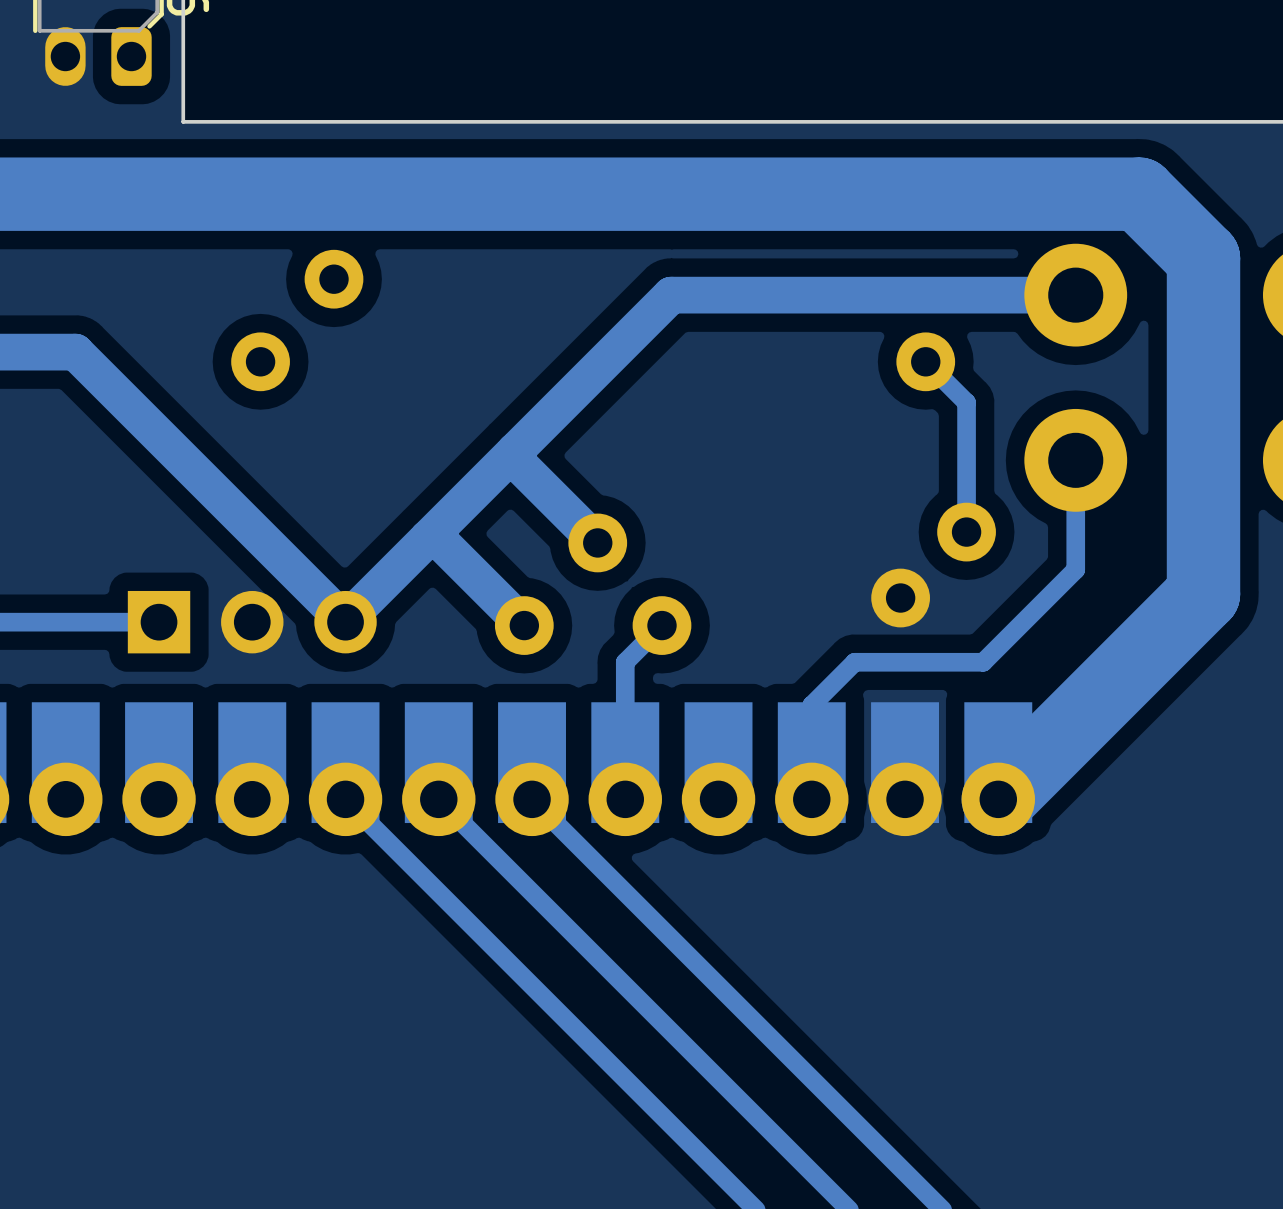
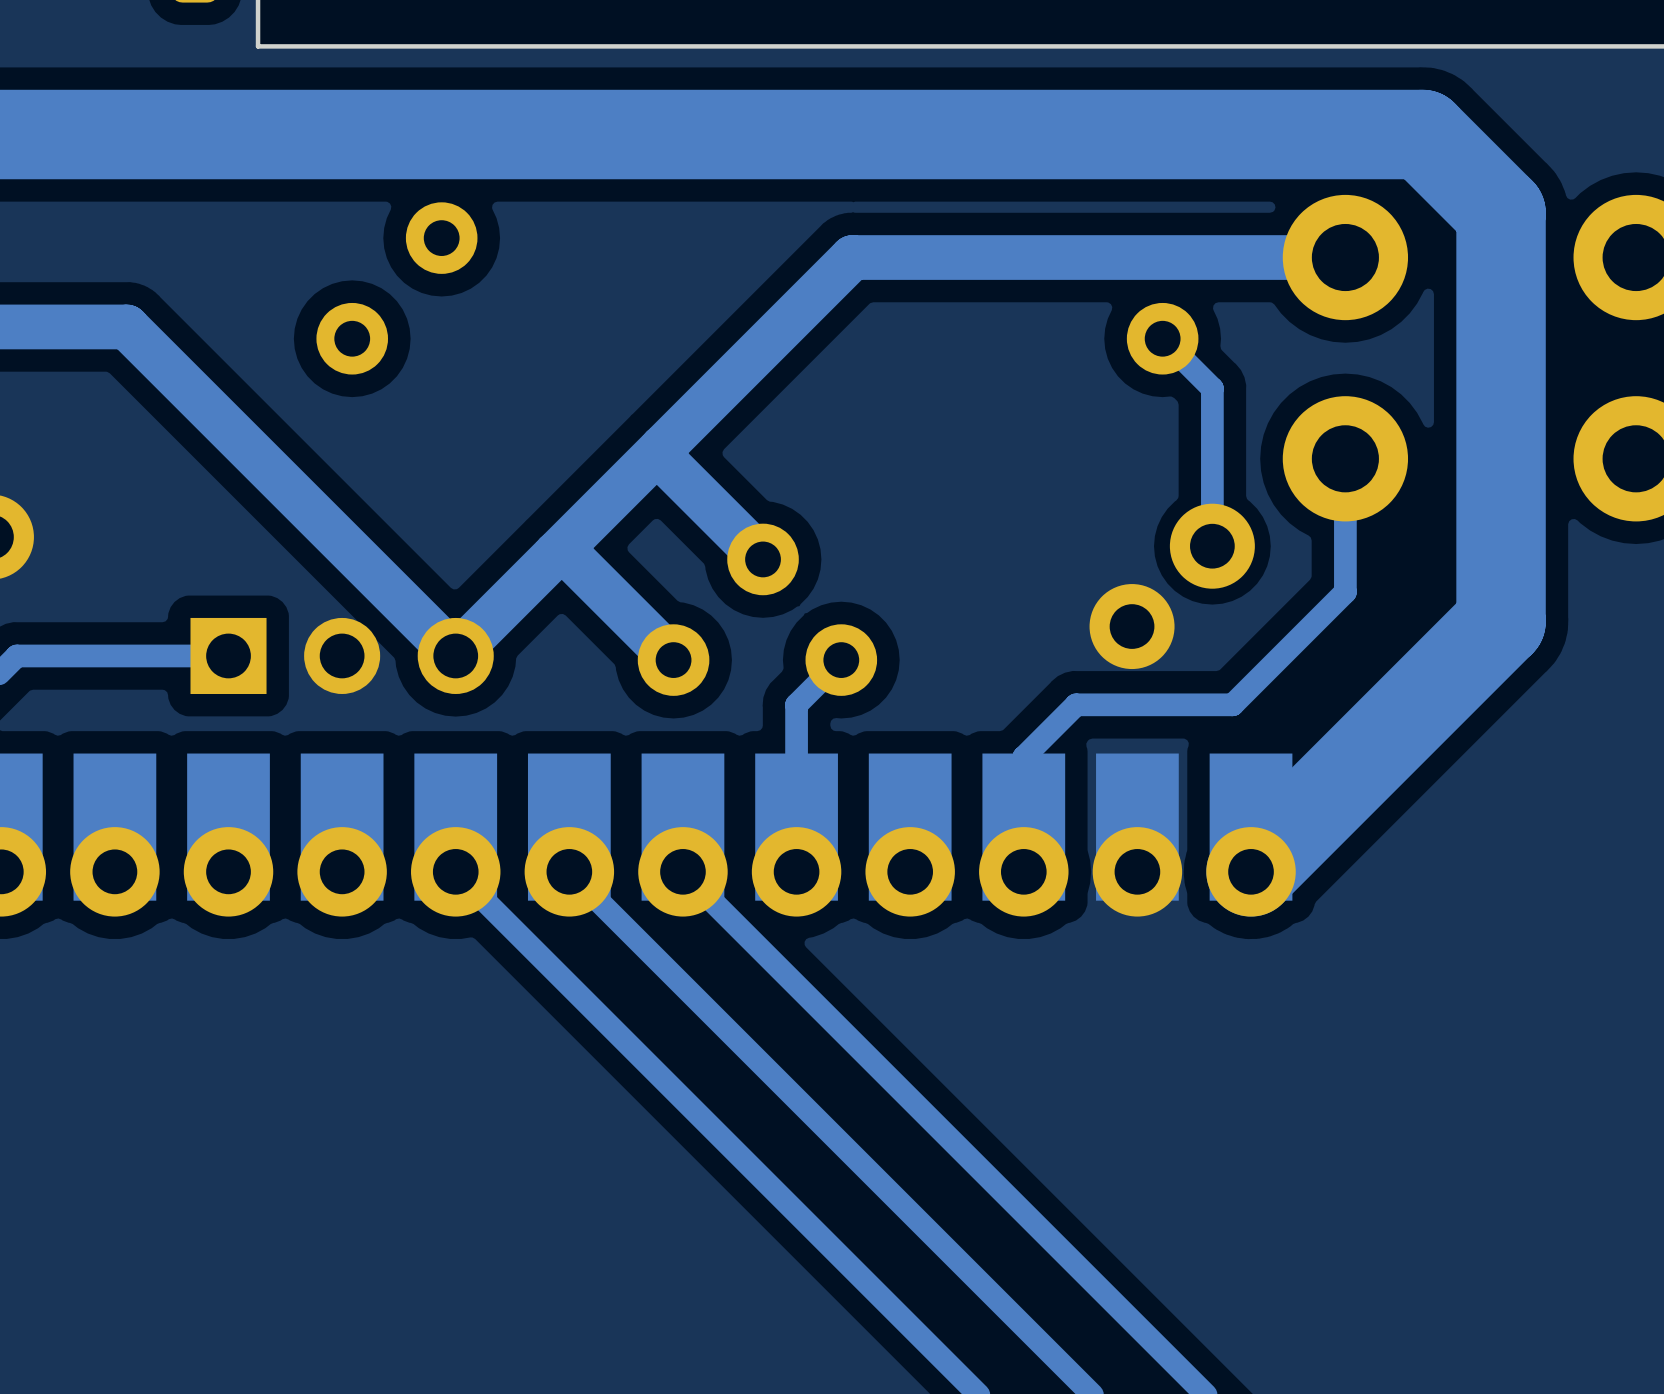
part footprint: [871, 502, 996, 628] -> [1089, 503, 1255, 670]

